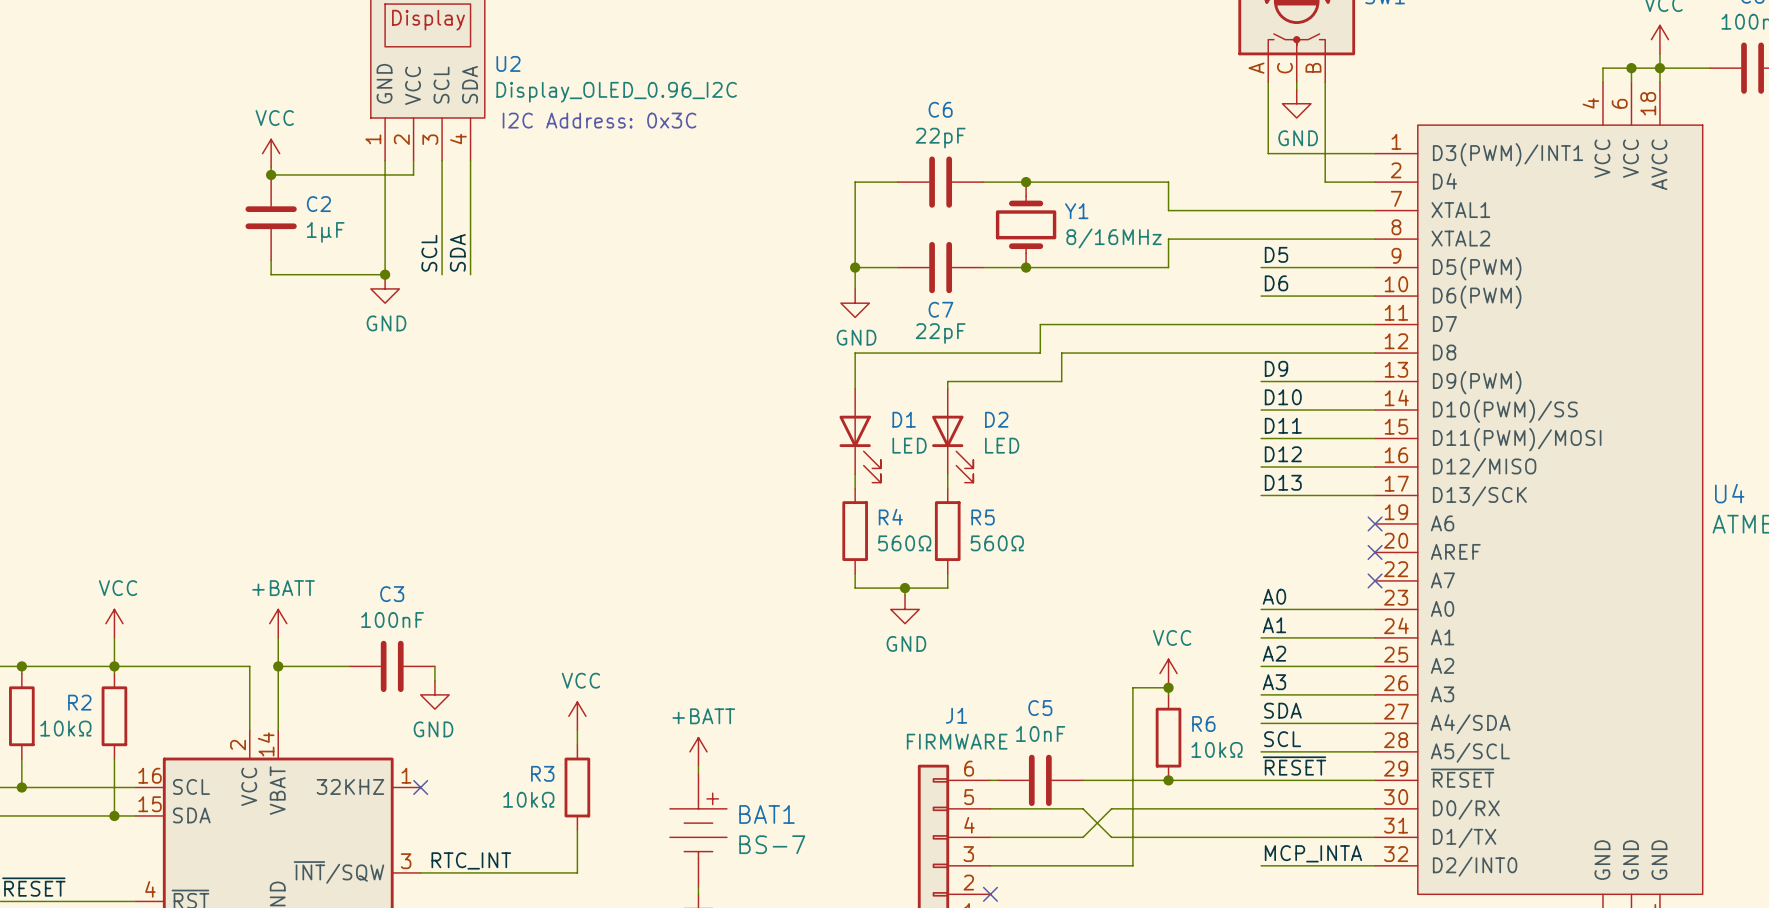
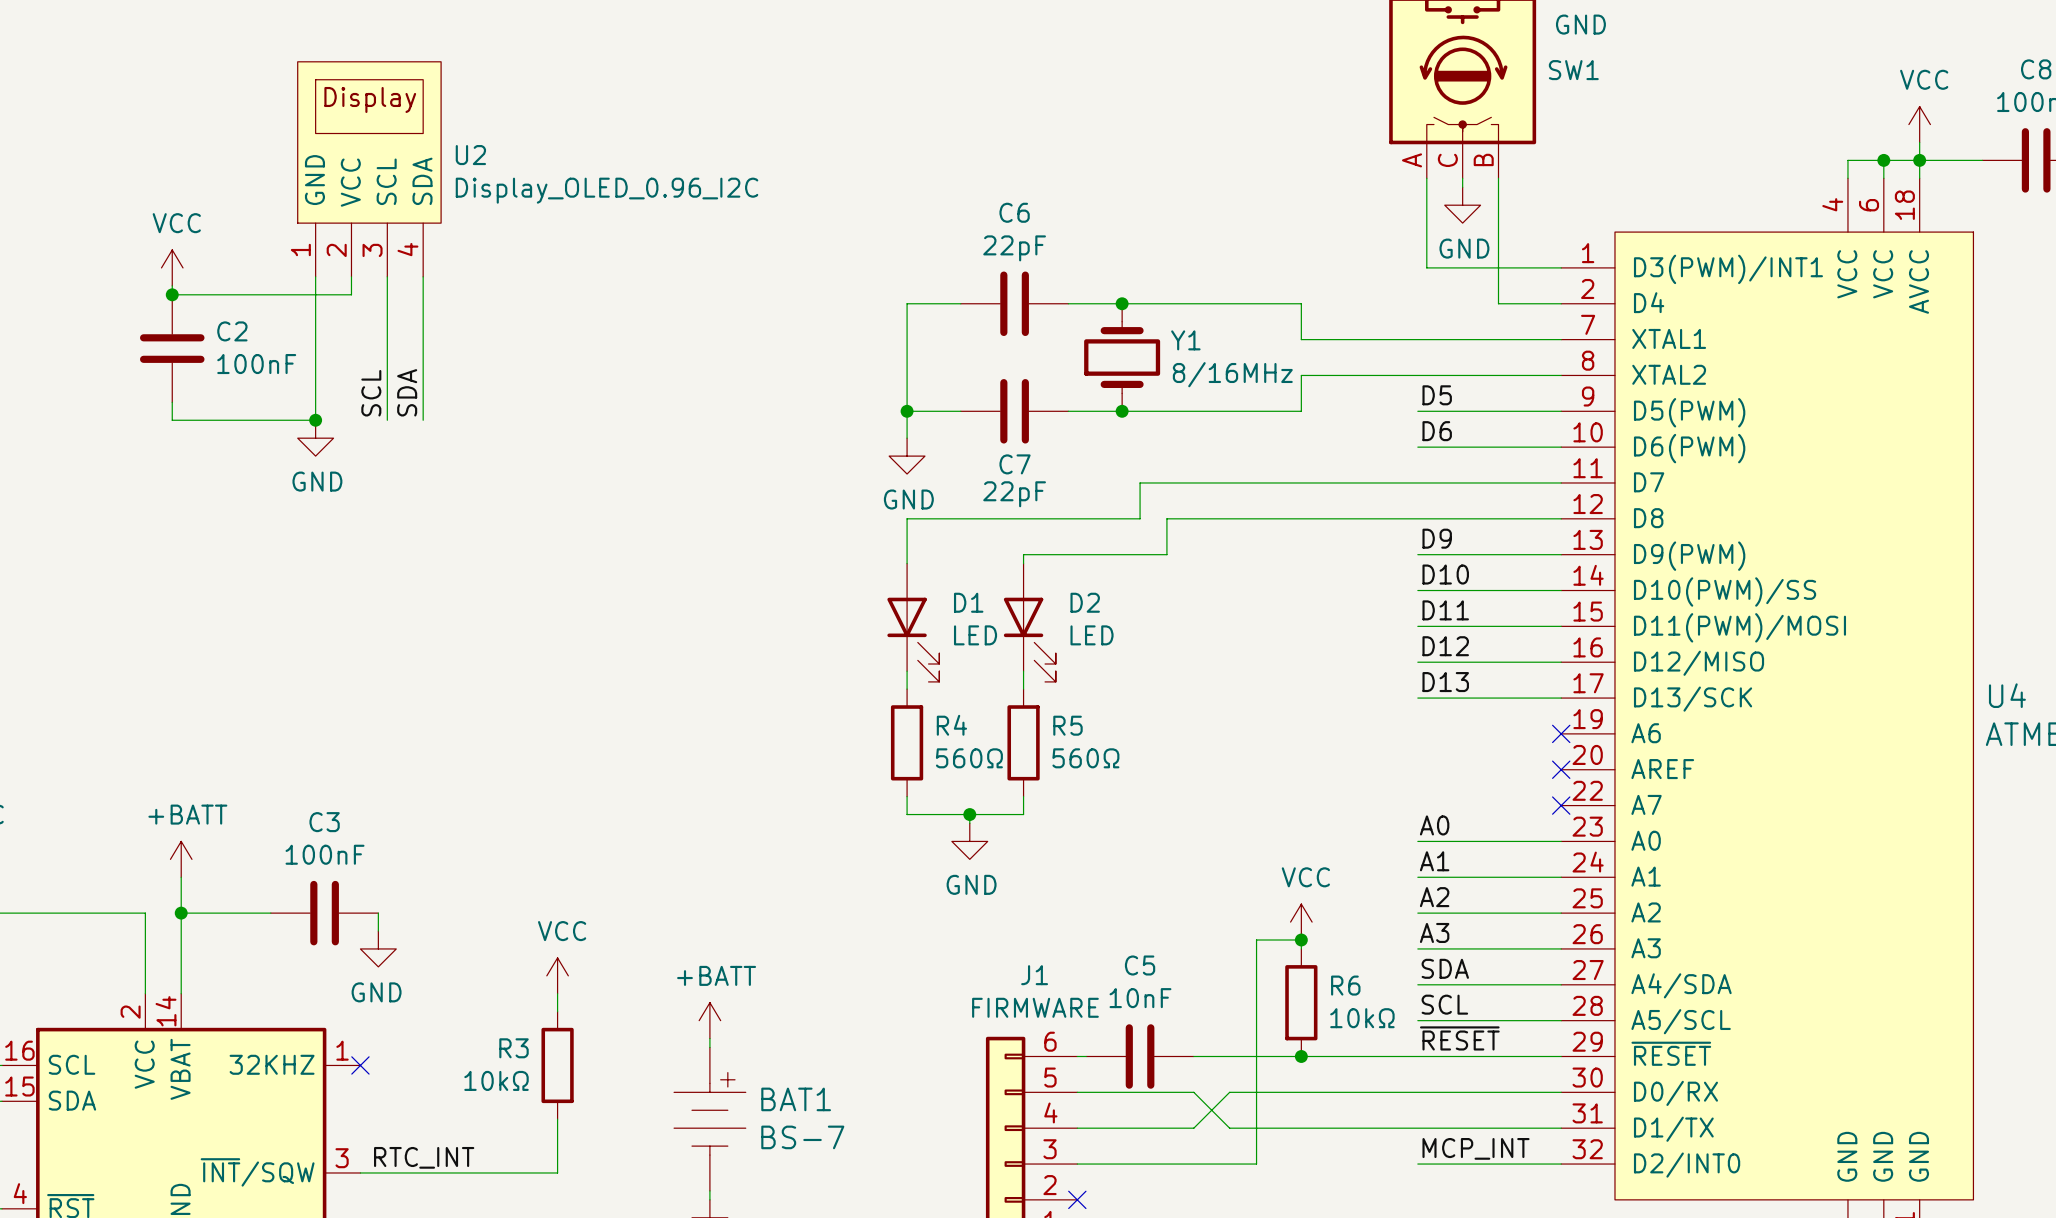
text: I2C Address: 0x3C (599, 120) -> none
C2 value: 1µF (325, 232) -> 100nF (256, 364)
label: MCP_INTA (1313, 853) -> MCP_INT (1476, 1148)

